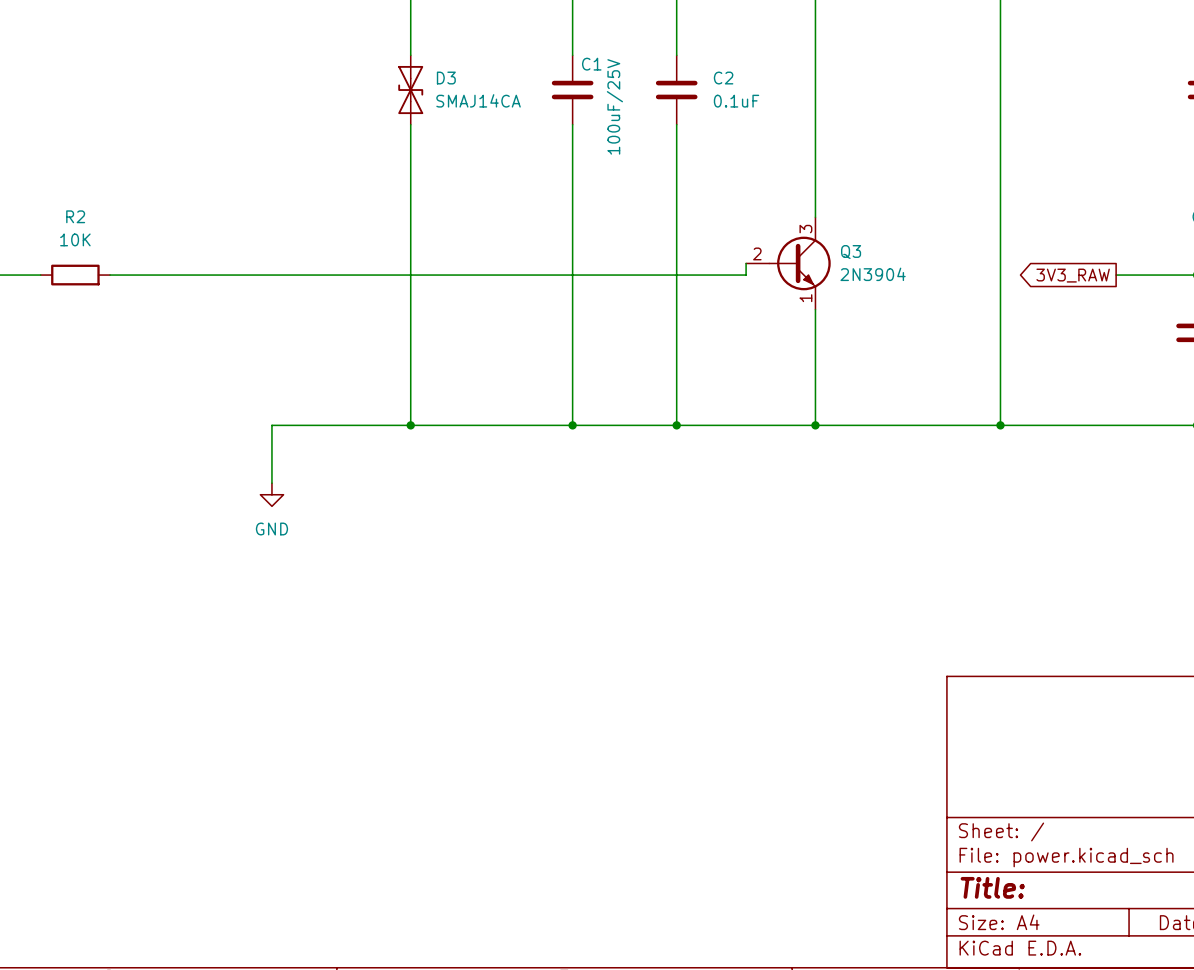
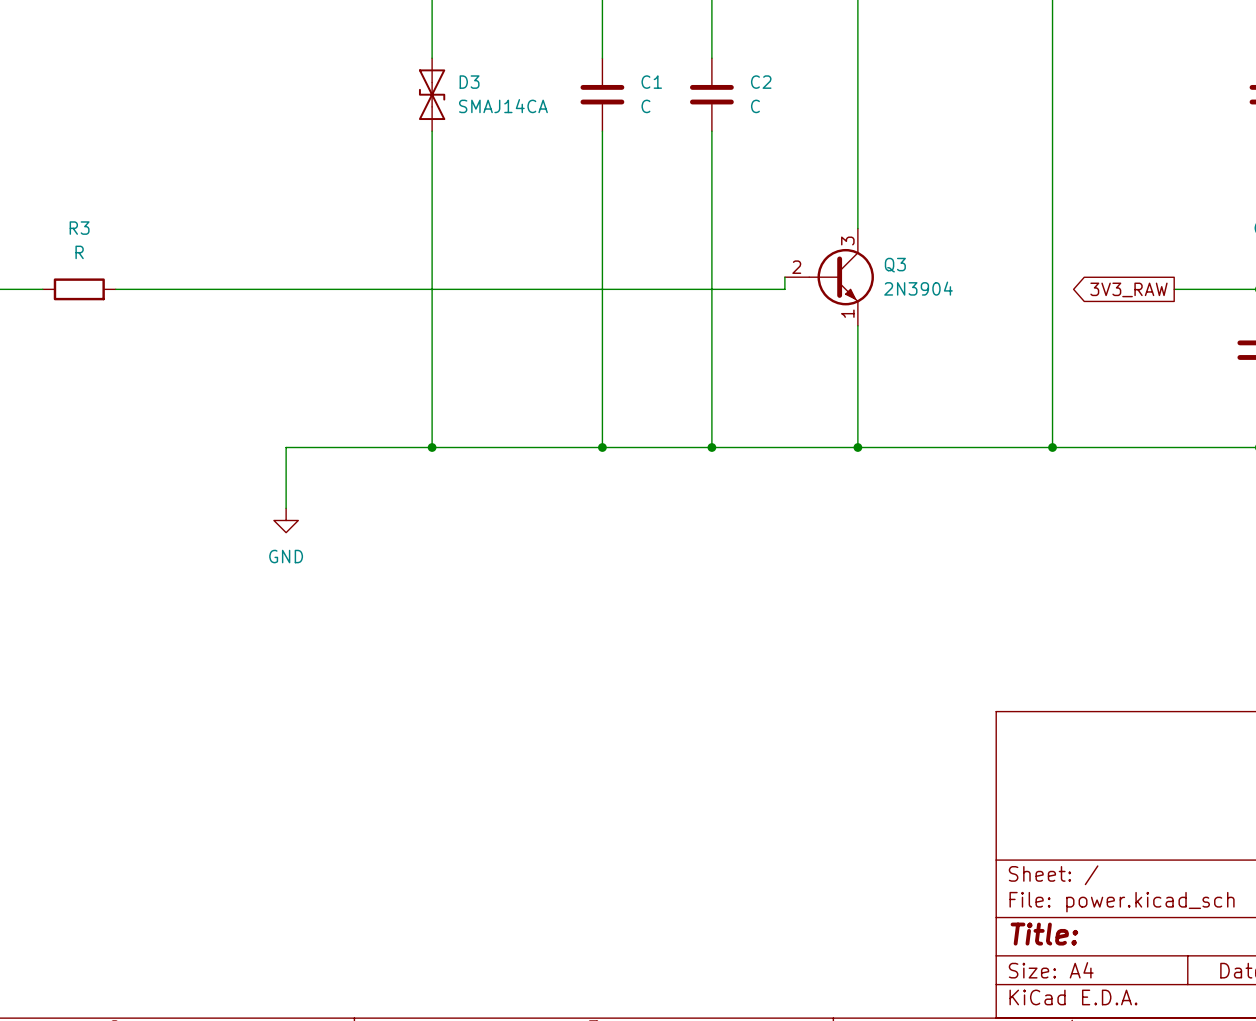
C1 name position: C1 (591, 64) -> C1 (651, 82)
C2 value: 0.1uF (736, 101) -> C (755, 106)
C1 value: 100uF/25V (614, 106) -> C (645, 106)
R2 name: R2 (75, 216) -> R3 (79, 228)
R2 value: 10K (75, 239) -> R (79, 252)

